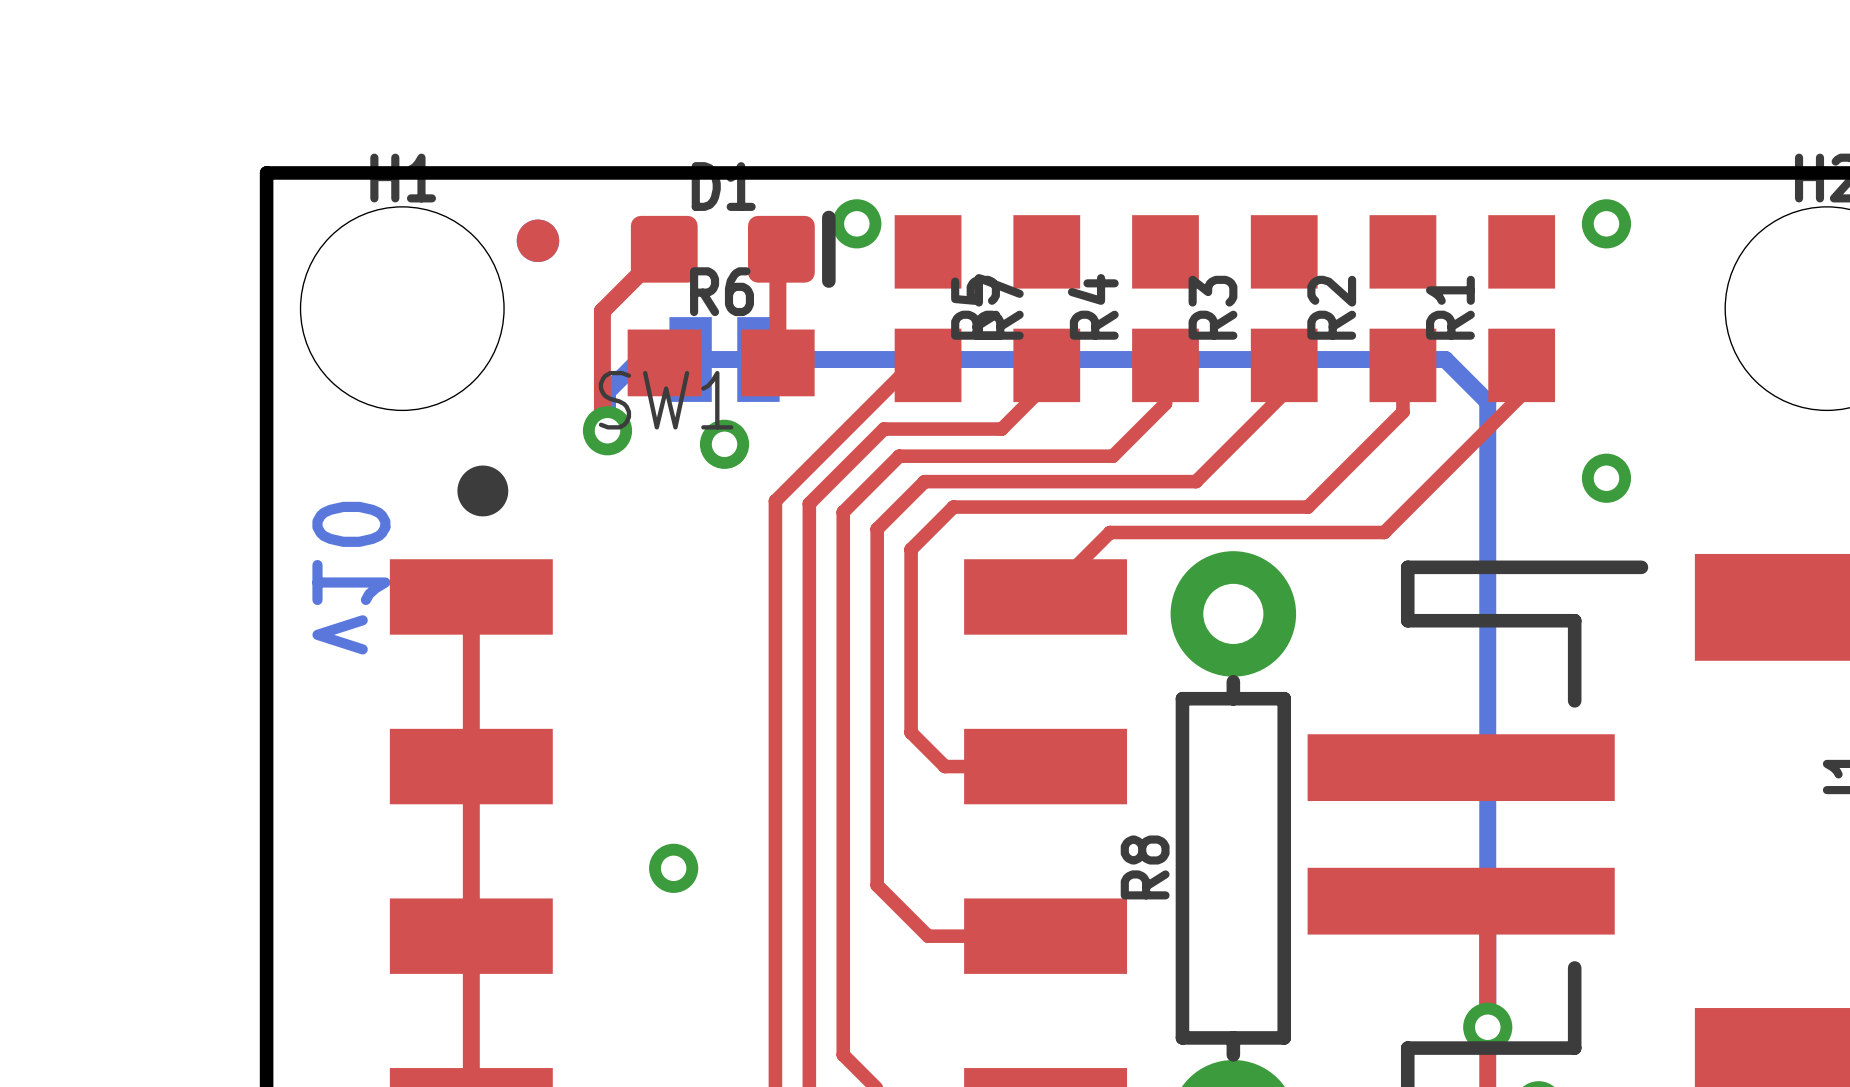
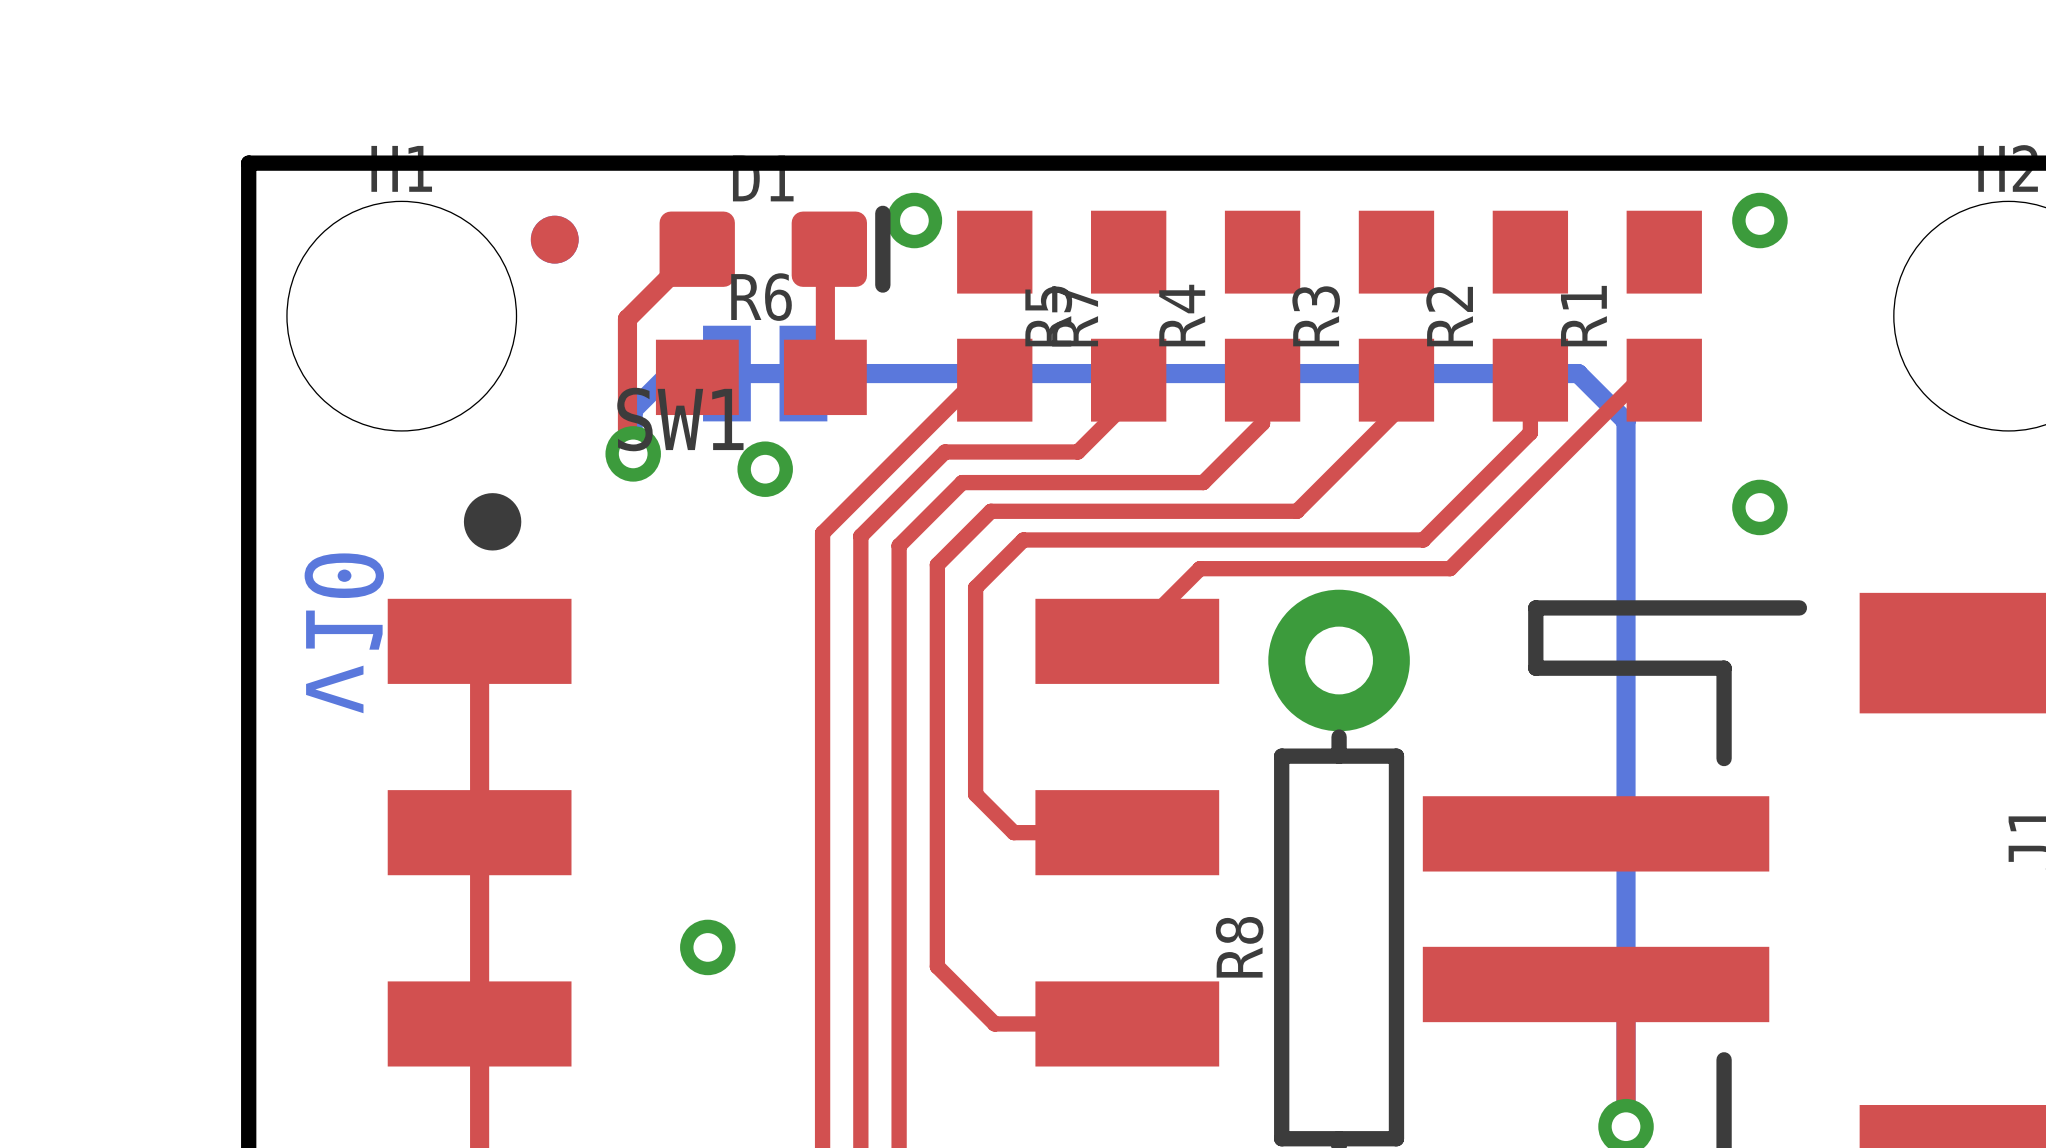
top track: (1521, 365) (1521, 395) (1384, 532) (1331, 532) -> (1664, 380) (1638, 380) (1450, 568)

